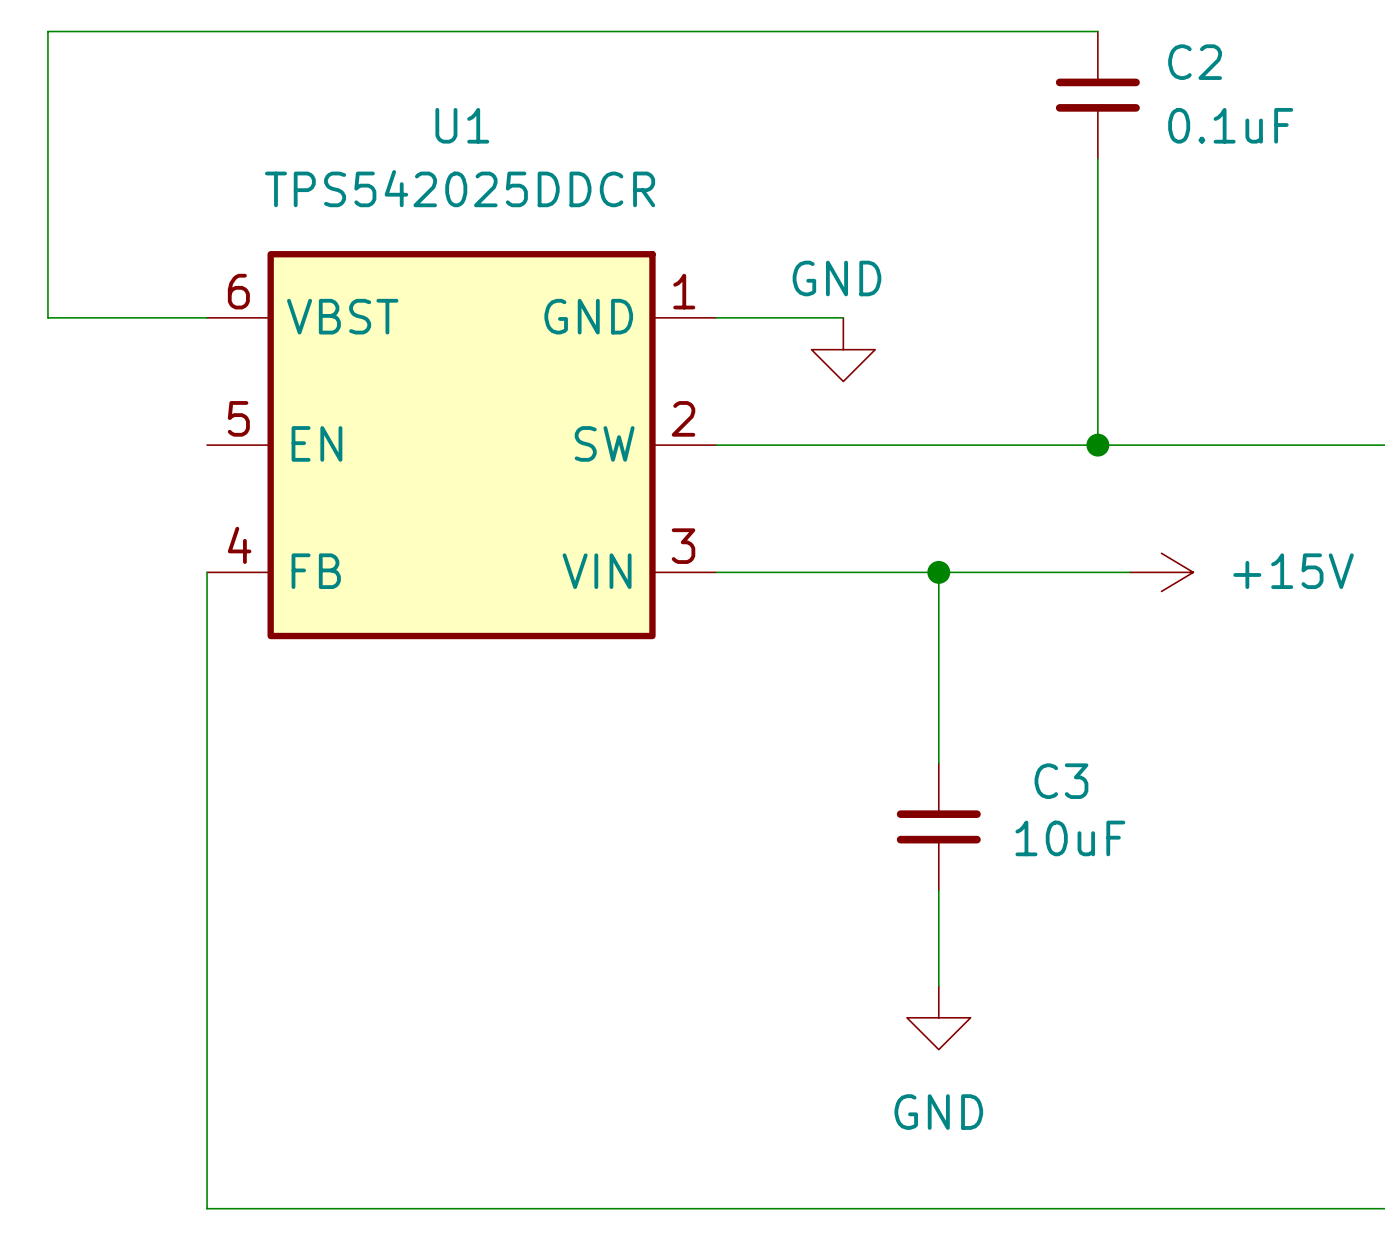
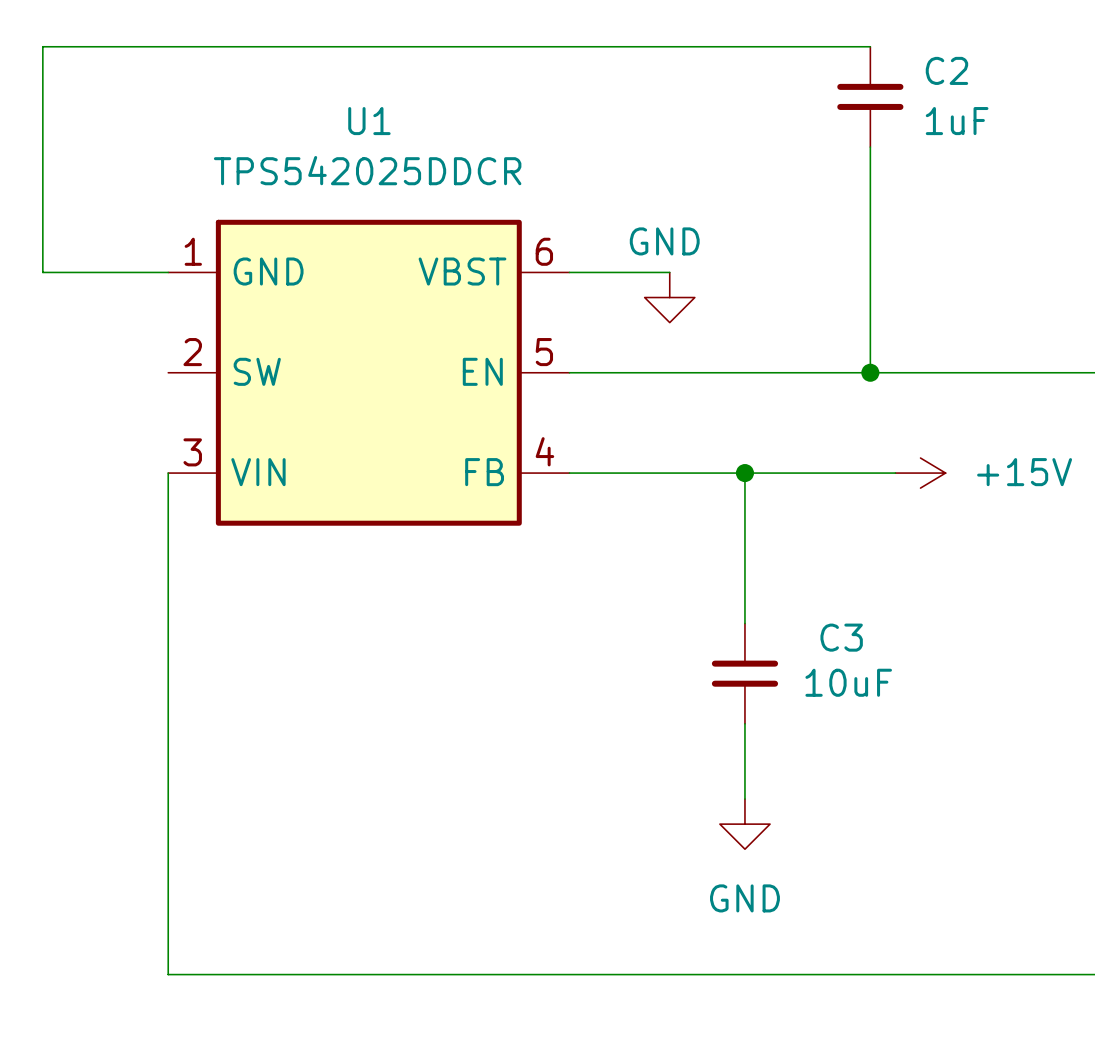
C2 value: 0.1uF (1230, 125) -> 1uF (957, 121)
U1 flip: as is (461, 445) -> left-right (368, 372)

